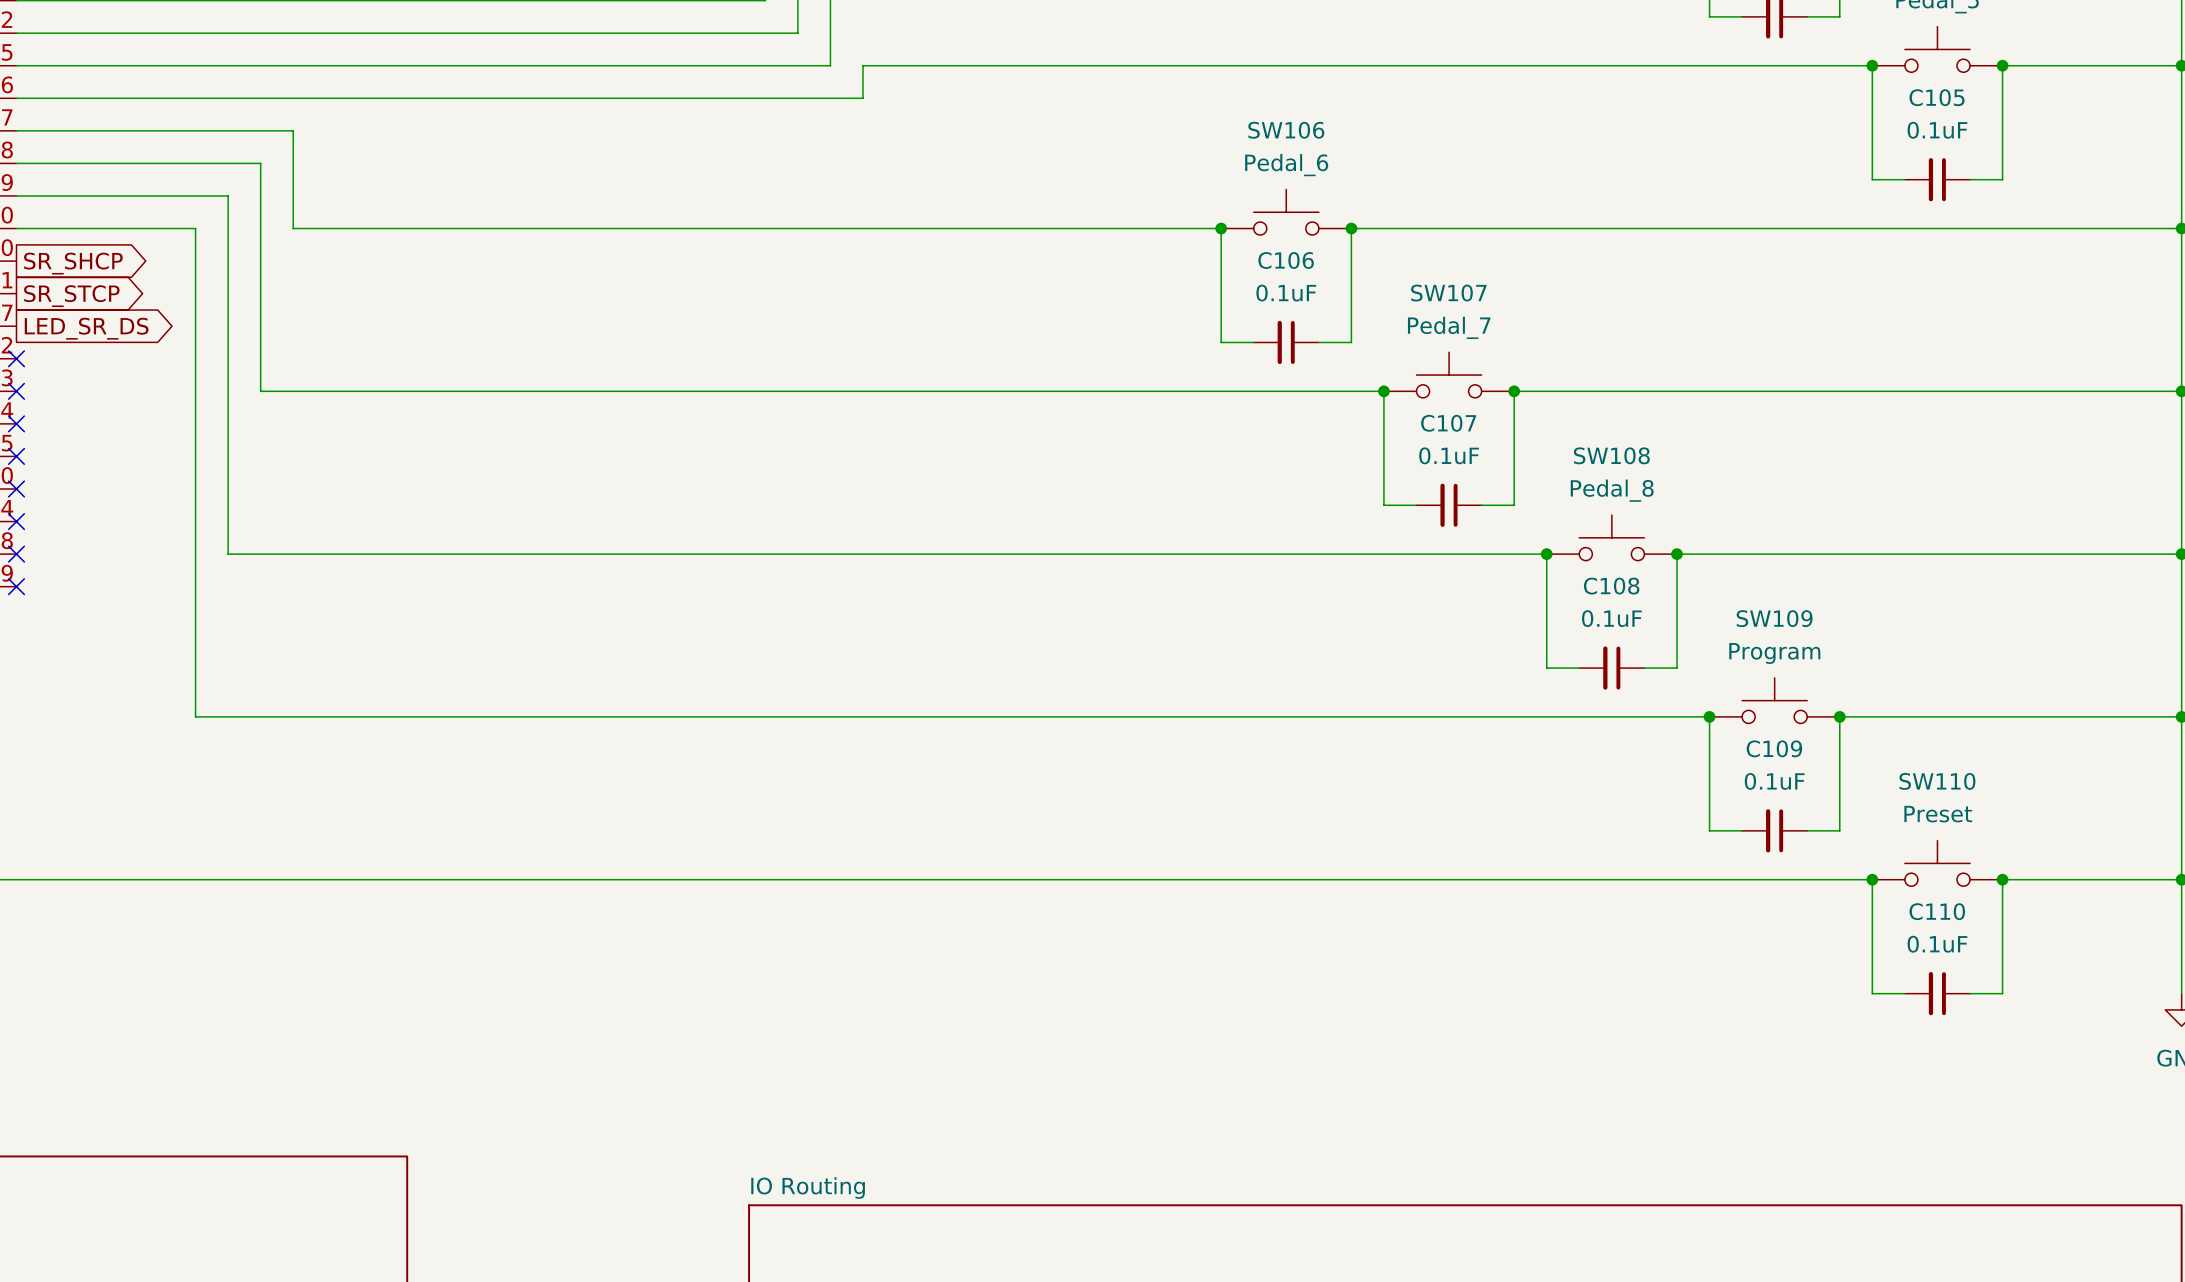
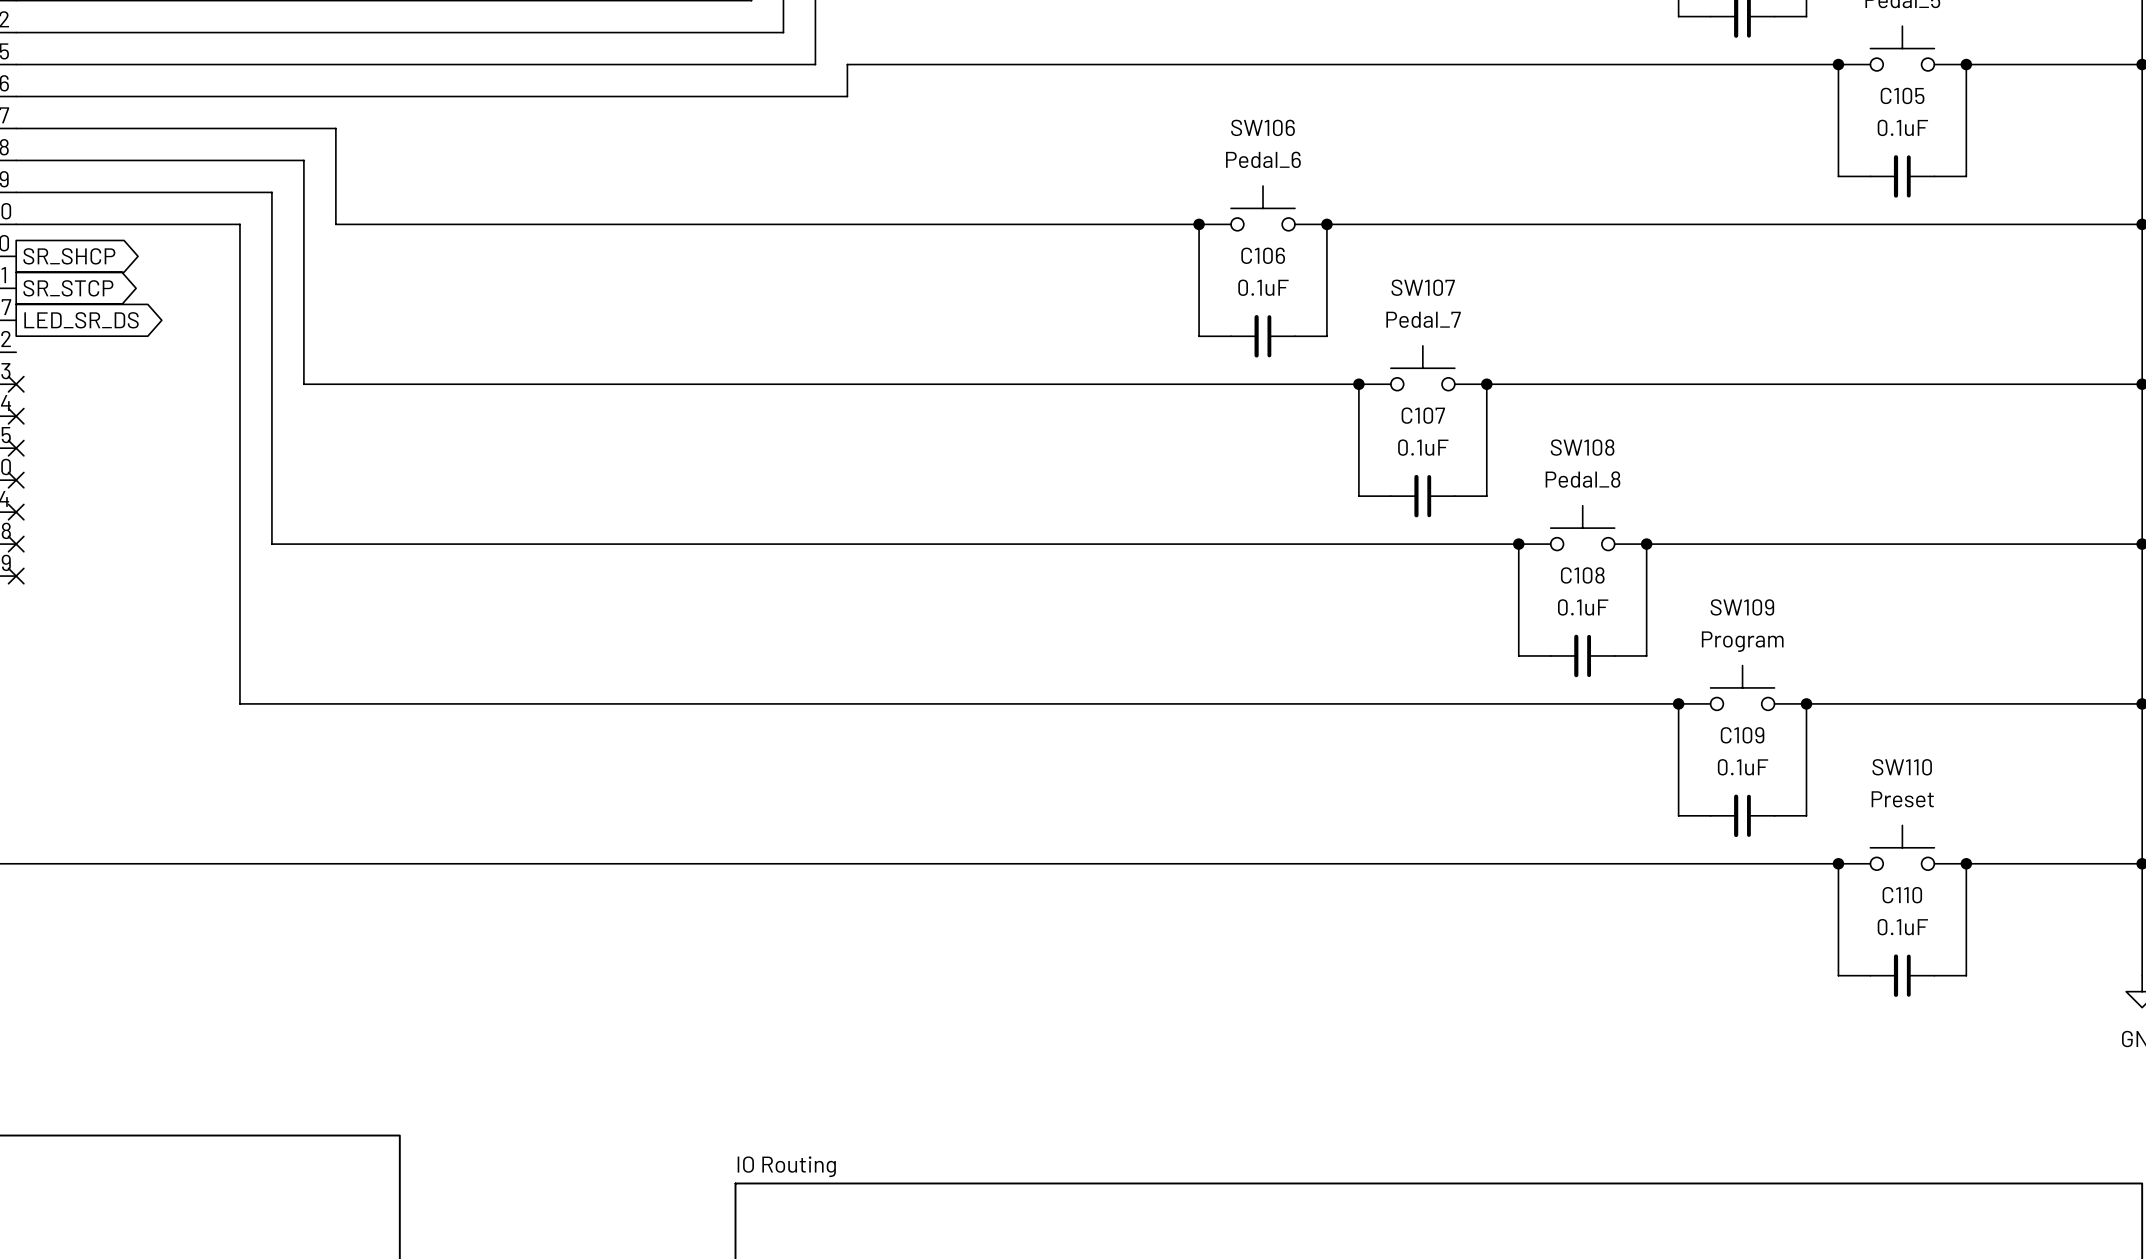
wire: (293, 130) (293, 228) (342, 228) -> (287, 128) (335, 128) (335, 224)
wire: (260, 163) (260, 391) (309, 391) -> (255, 160) (303, 160) (303, 384)
wire: (228, 195) (228, 554) (276, 554) -> (223, 192) (271, 192) (271, 544)
wire: (195, 228) (195, 716) (244, 716) -> (192, 224) (239, 224) (239, 703)
no-connect mark: (16, 358) -> none

